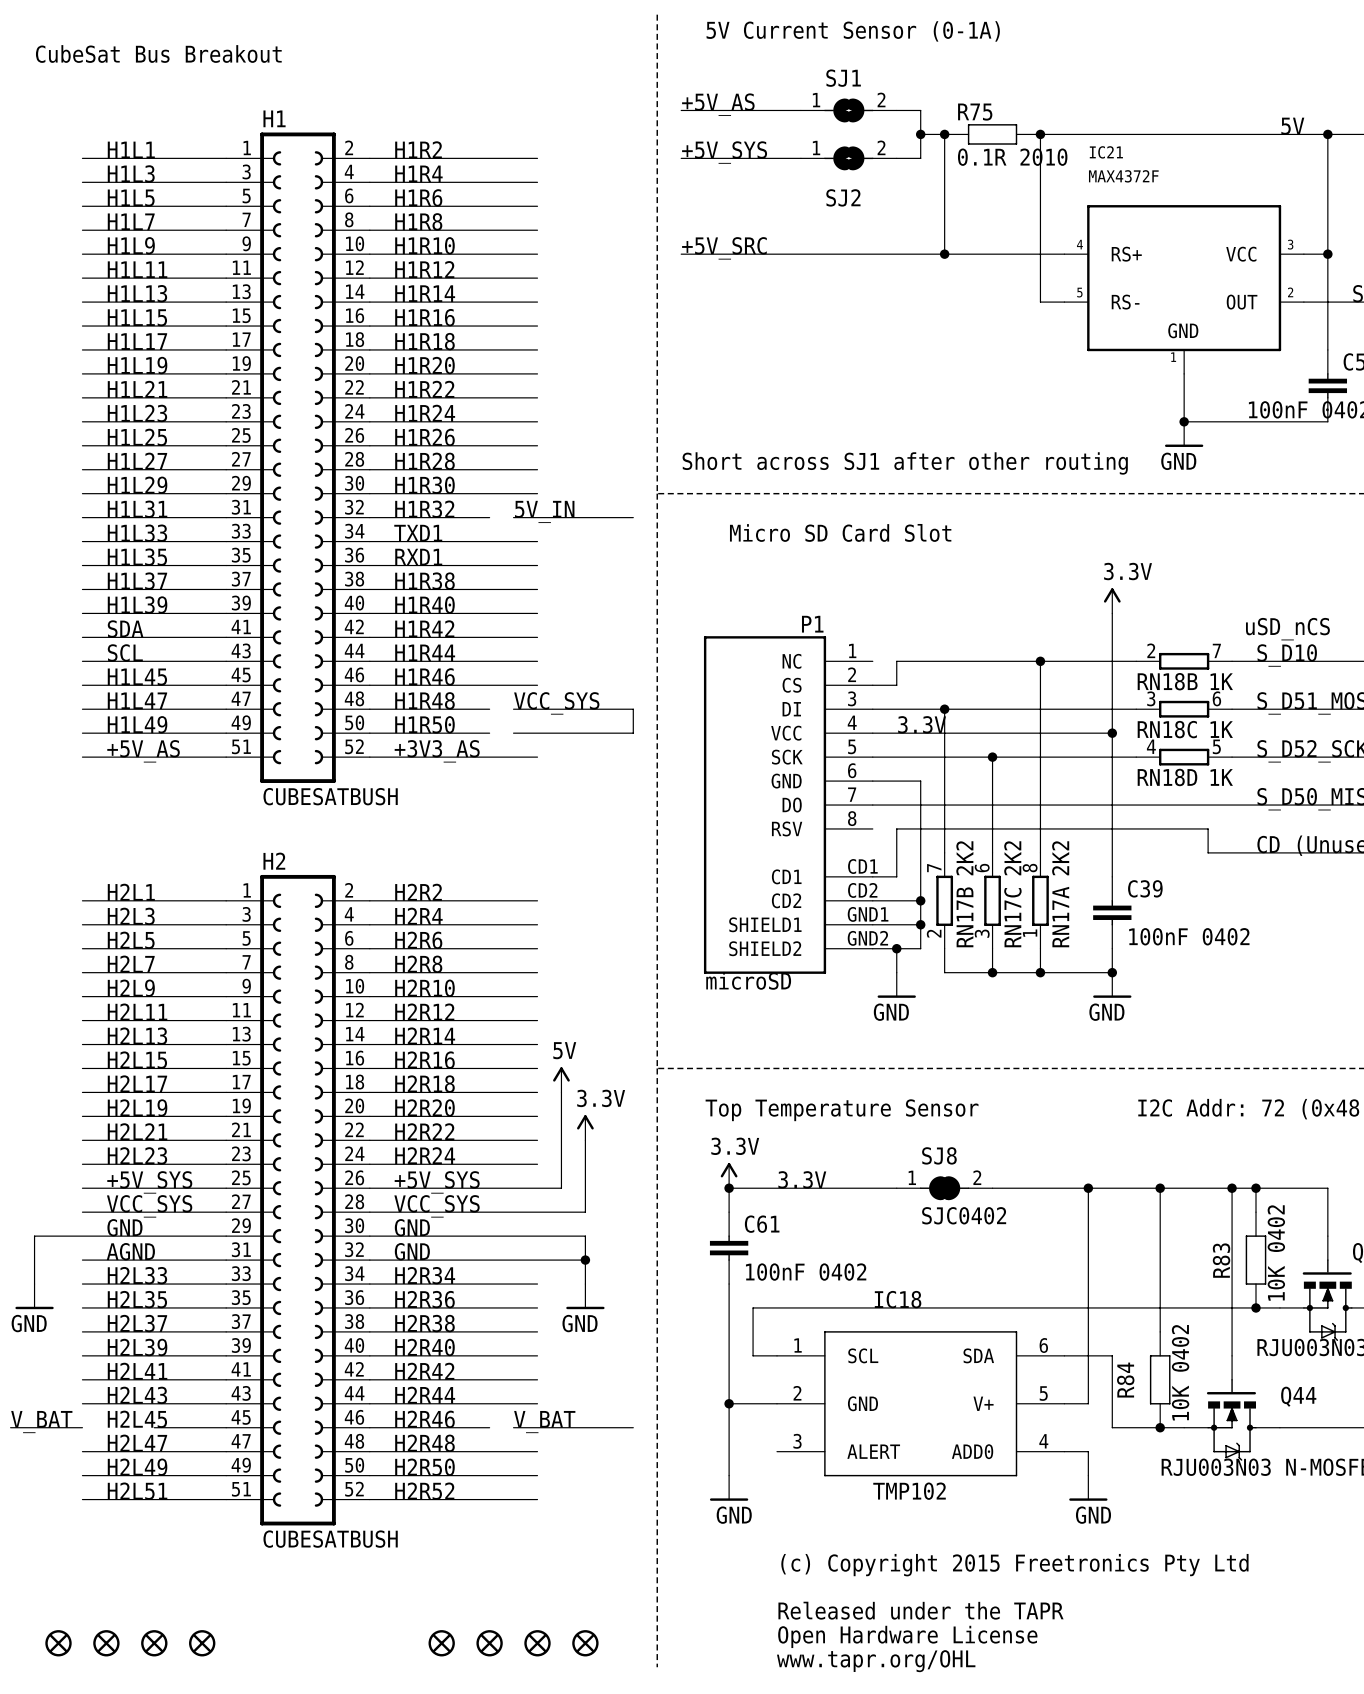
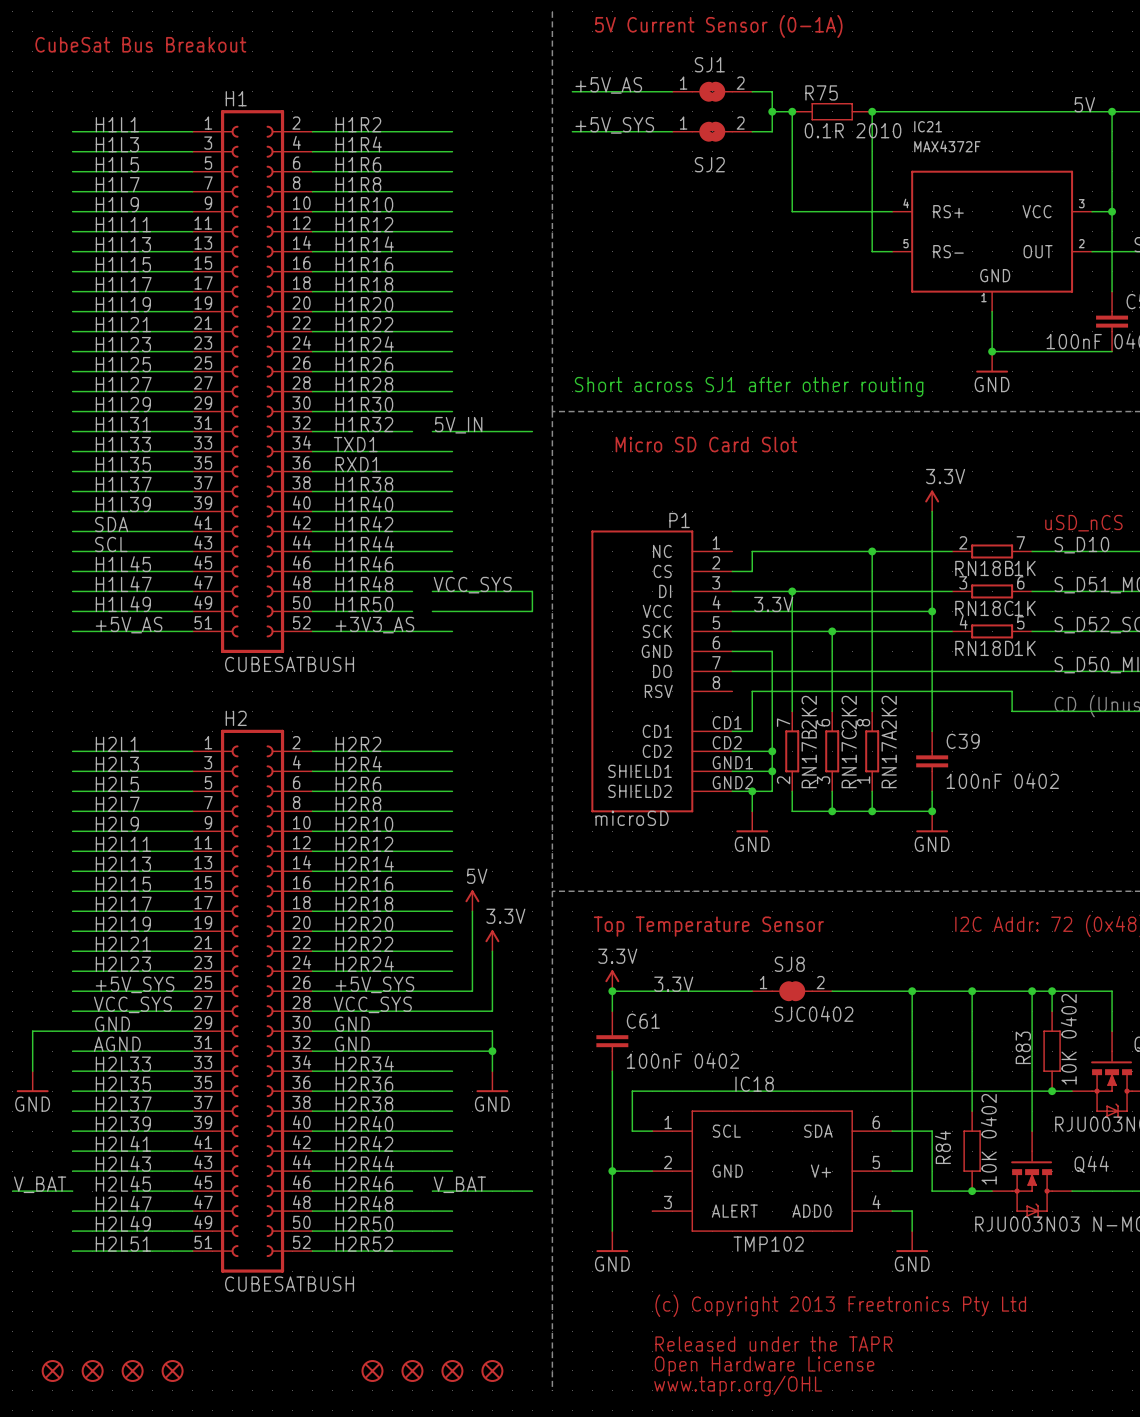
label: +5V_SRC (724, 248) -> none
wire: (681, 254) (944, 254) -> none
junction: (944, 254) -> none
text: (c) Copyright 2015 Freetronics Pty Ltd (1014, 1565) -> (c) Copyright 2013 Freetronics Pty Ltd (840, 1305)

